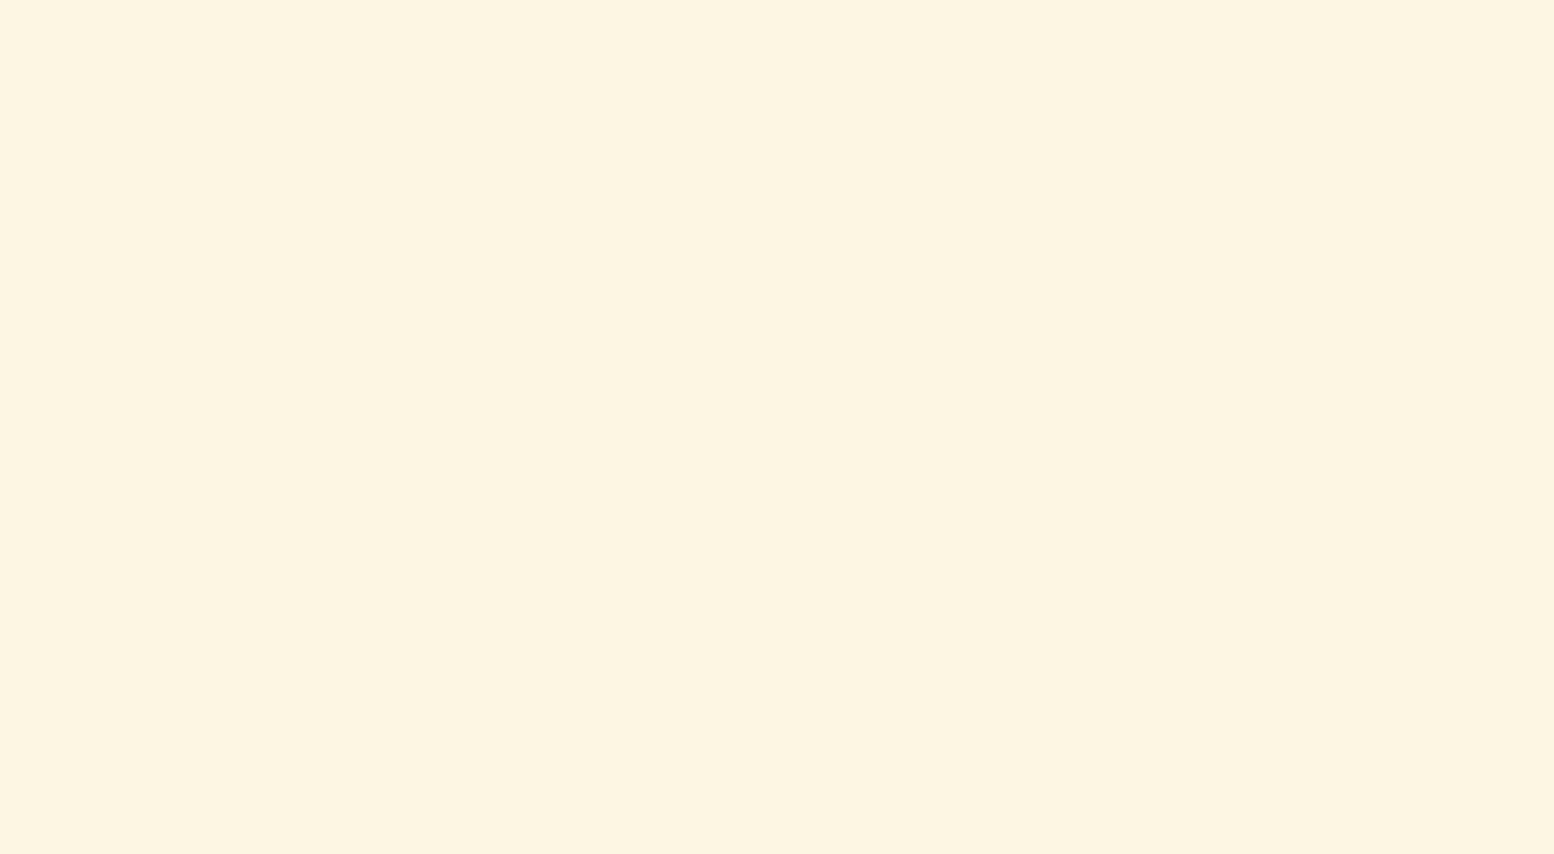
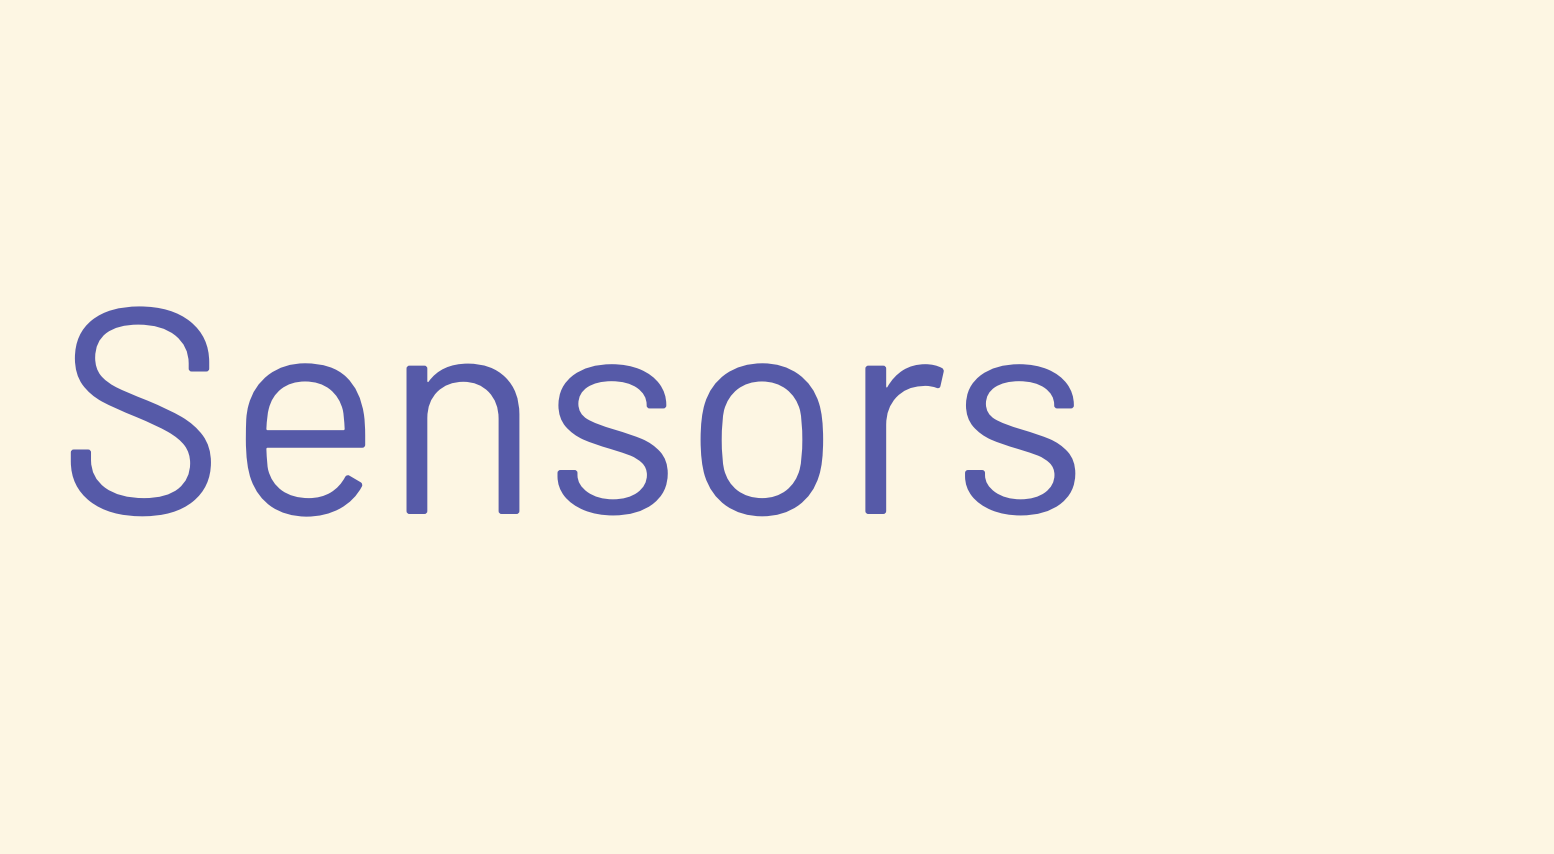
text: none -> Sensors (573, 411)

